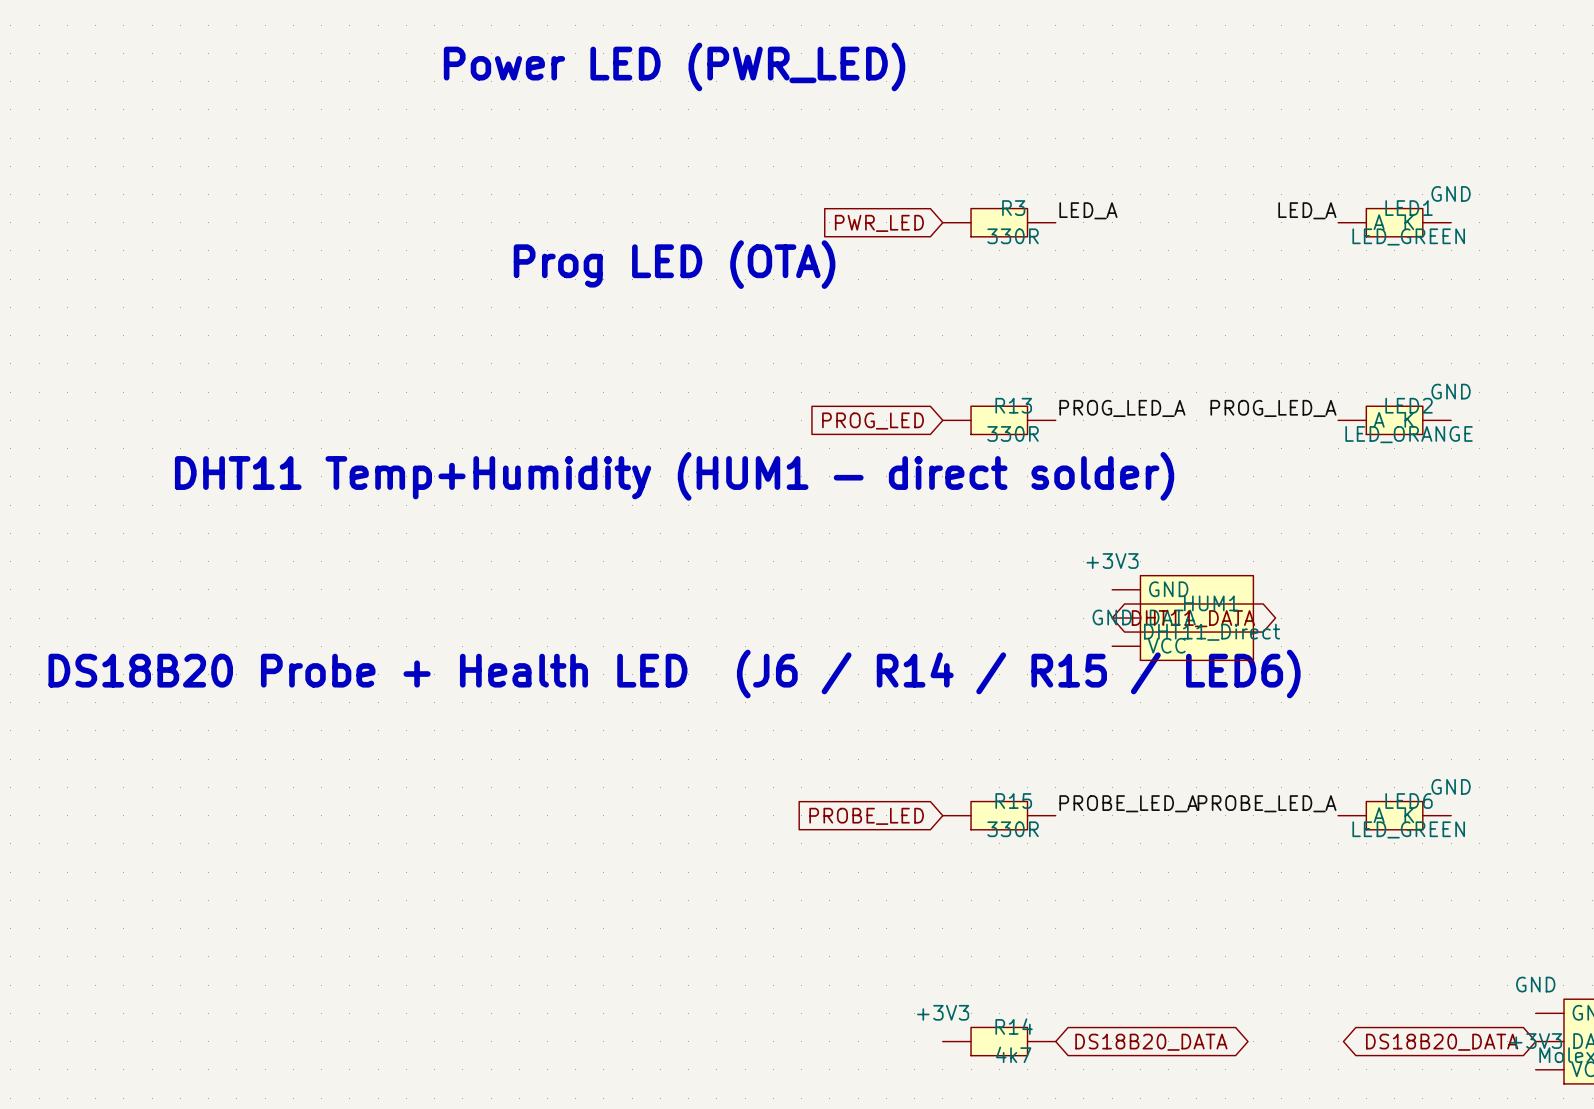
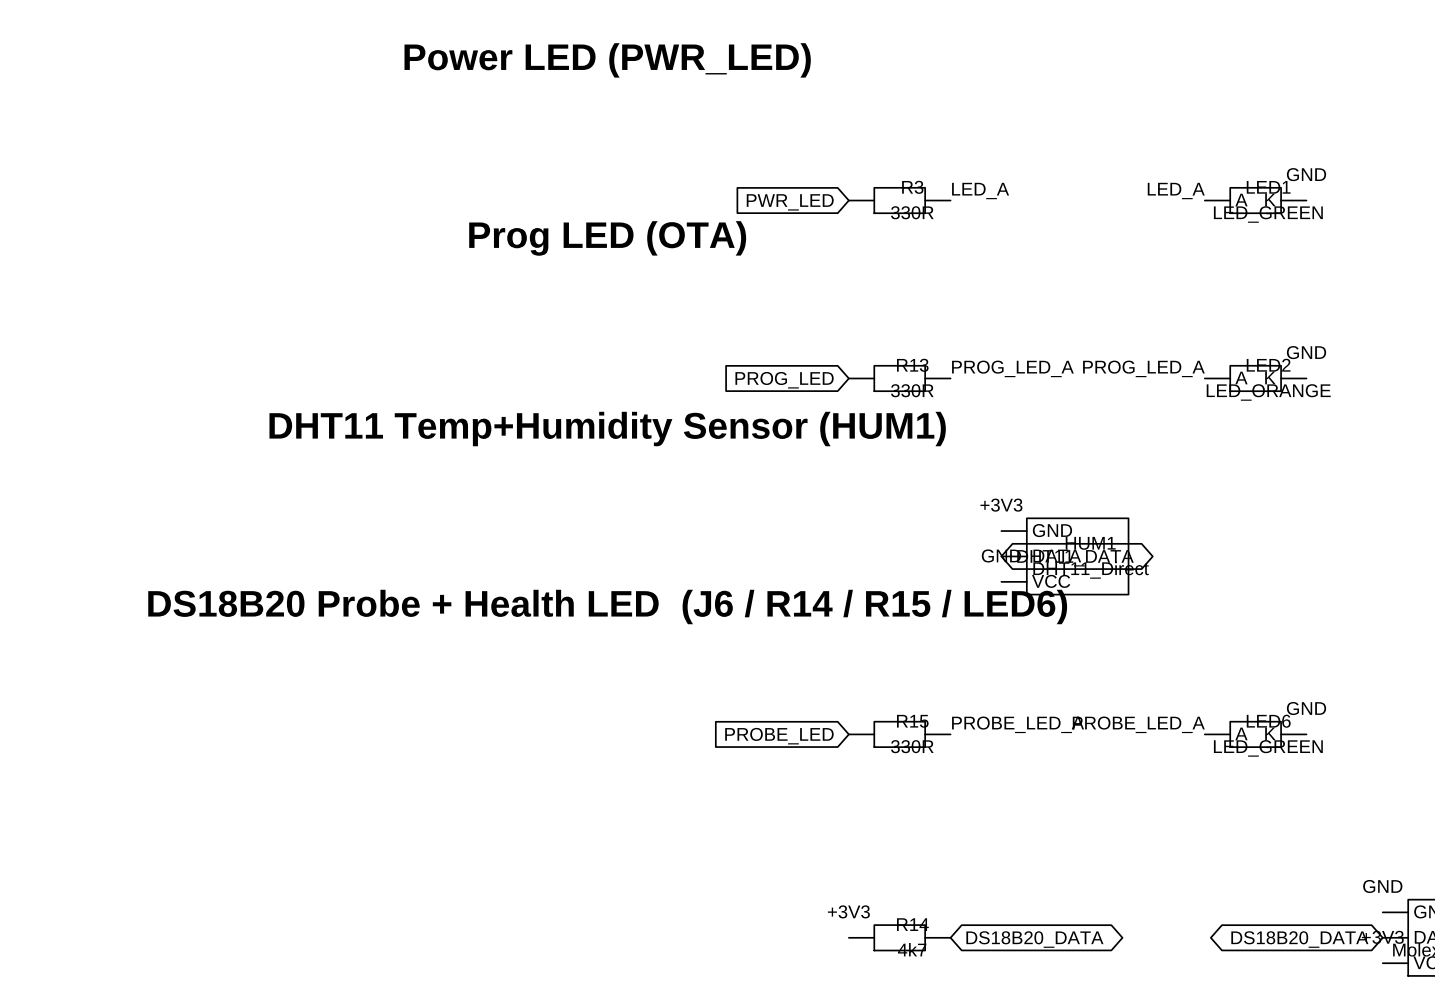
text: DHT11 Temp+Humidity (HUM1 — direct solder) (674, 476) -> DHT11 Temp+Humidity Sensor (HUM1) (607, 429)

